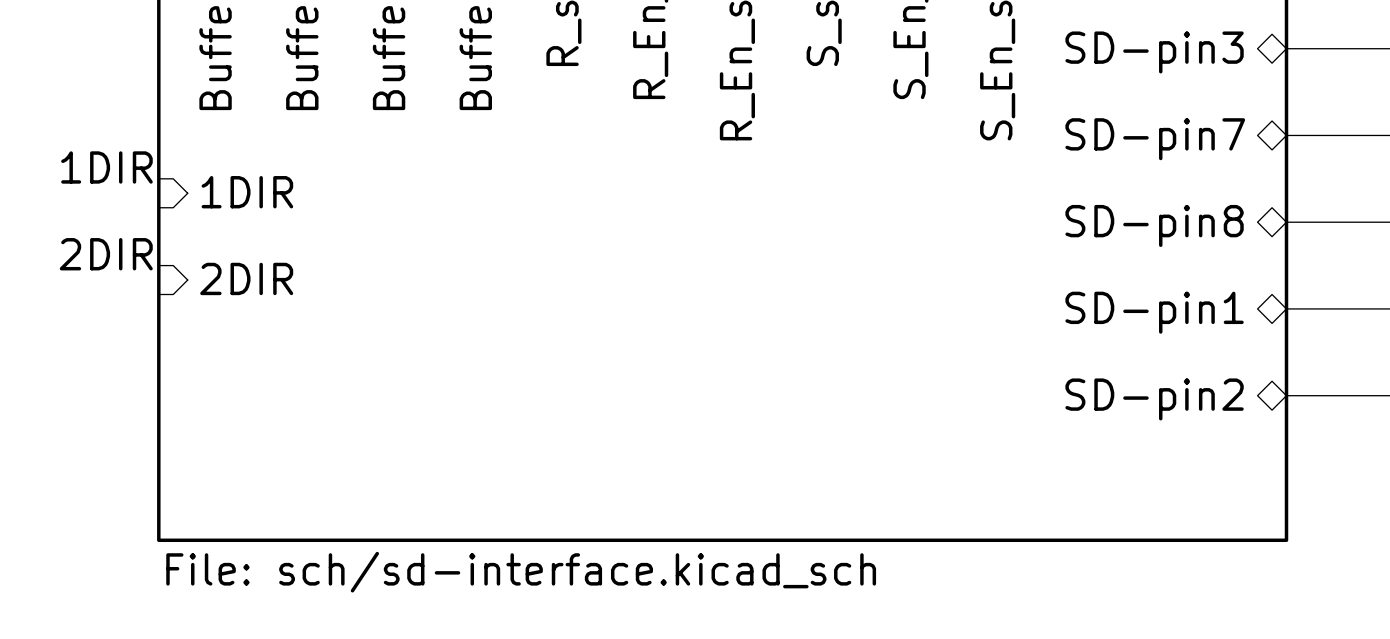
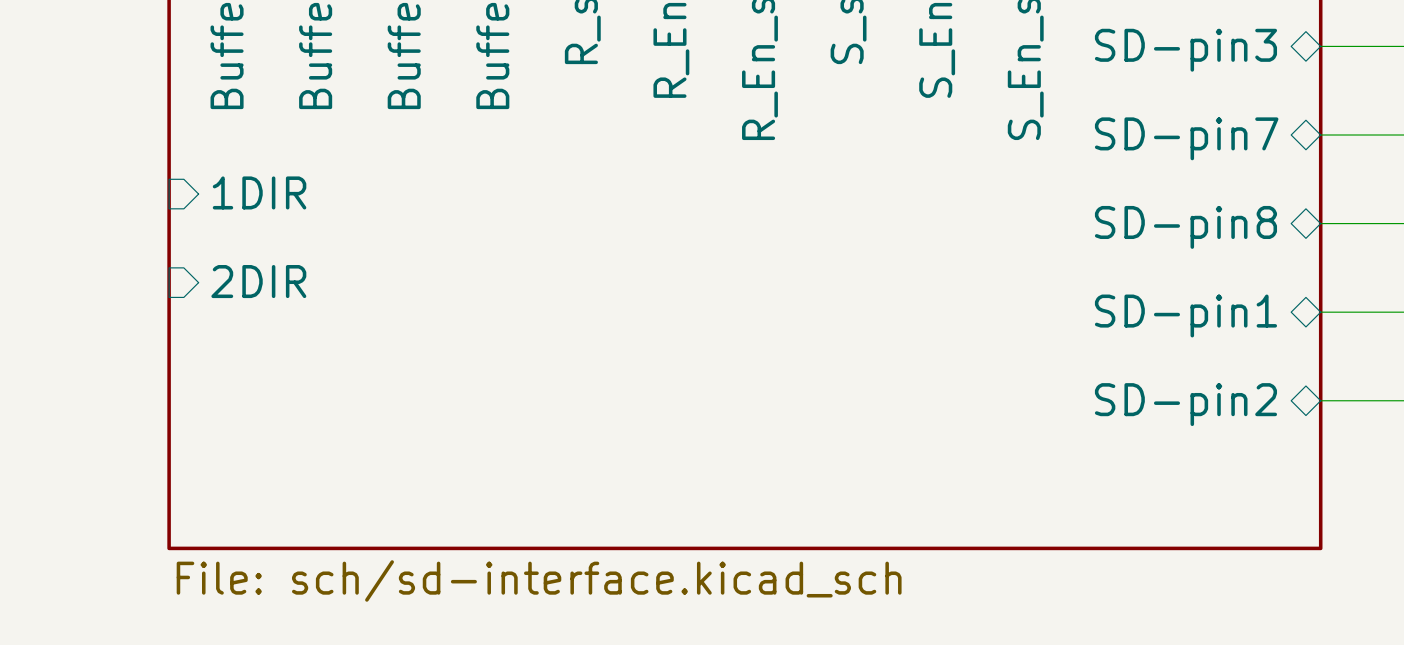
label: 1DIR (106, 167) -> none
label: 2DIR (106, 254) -> none

